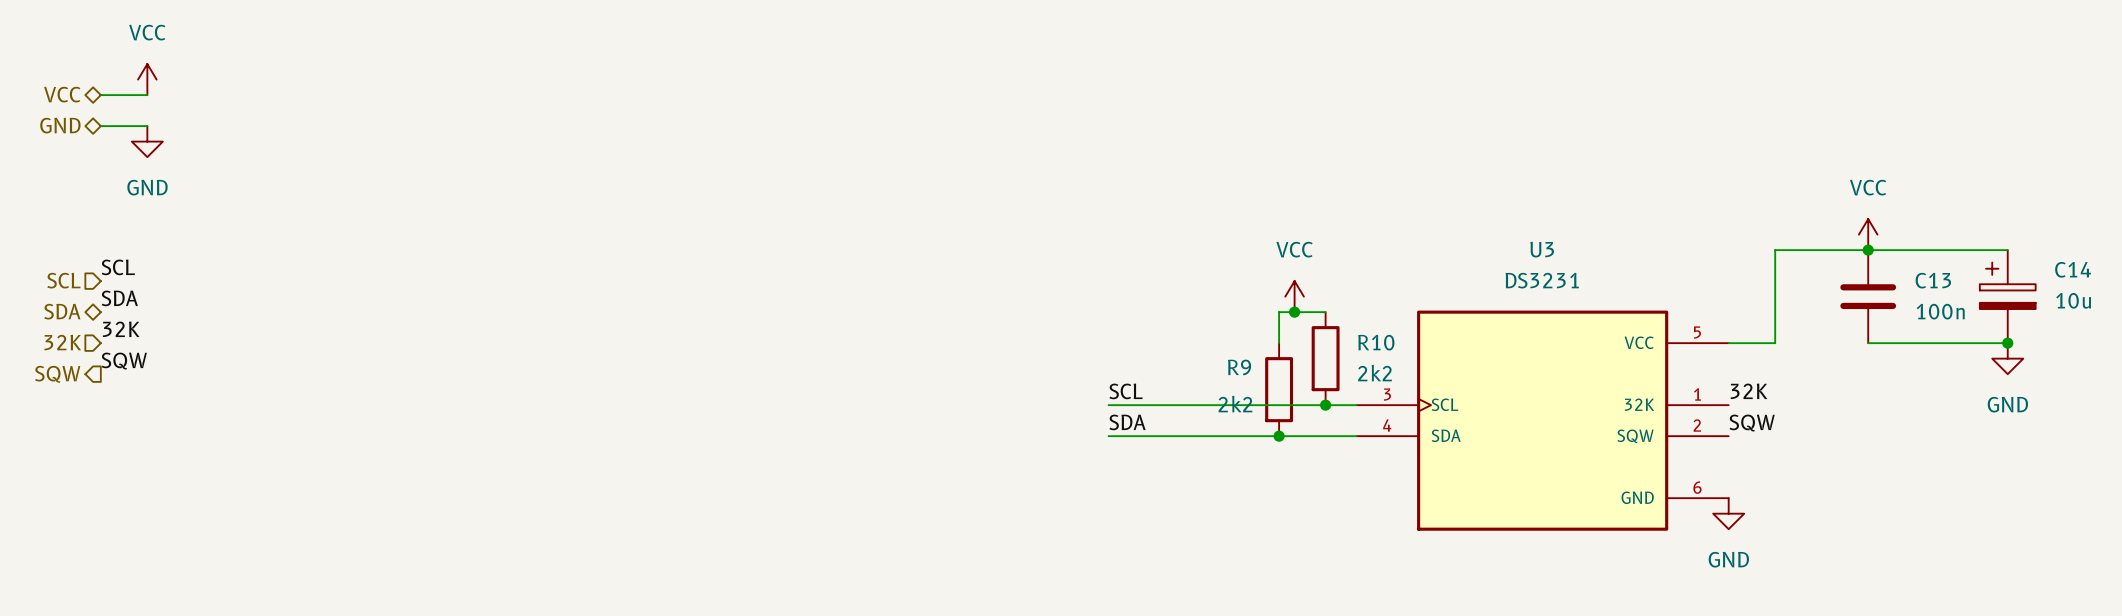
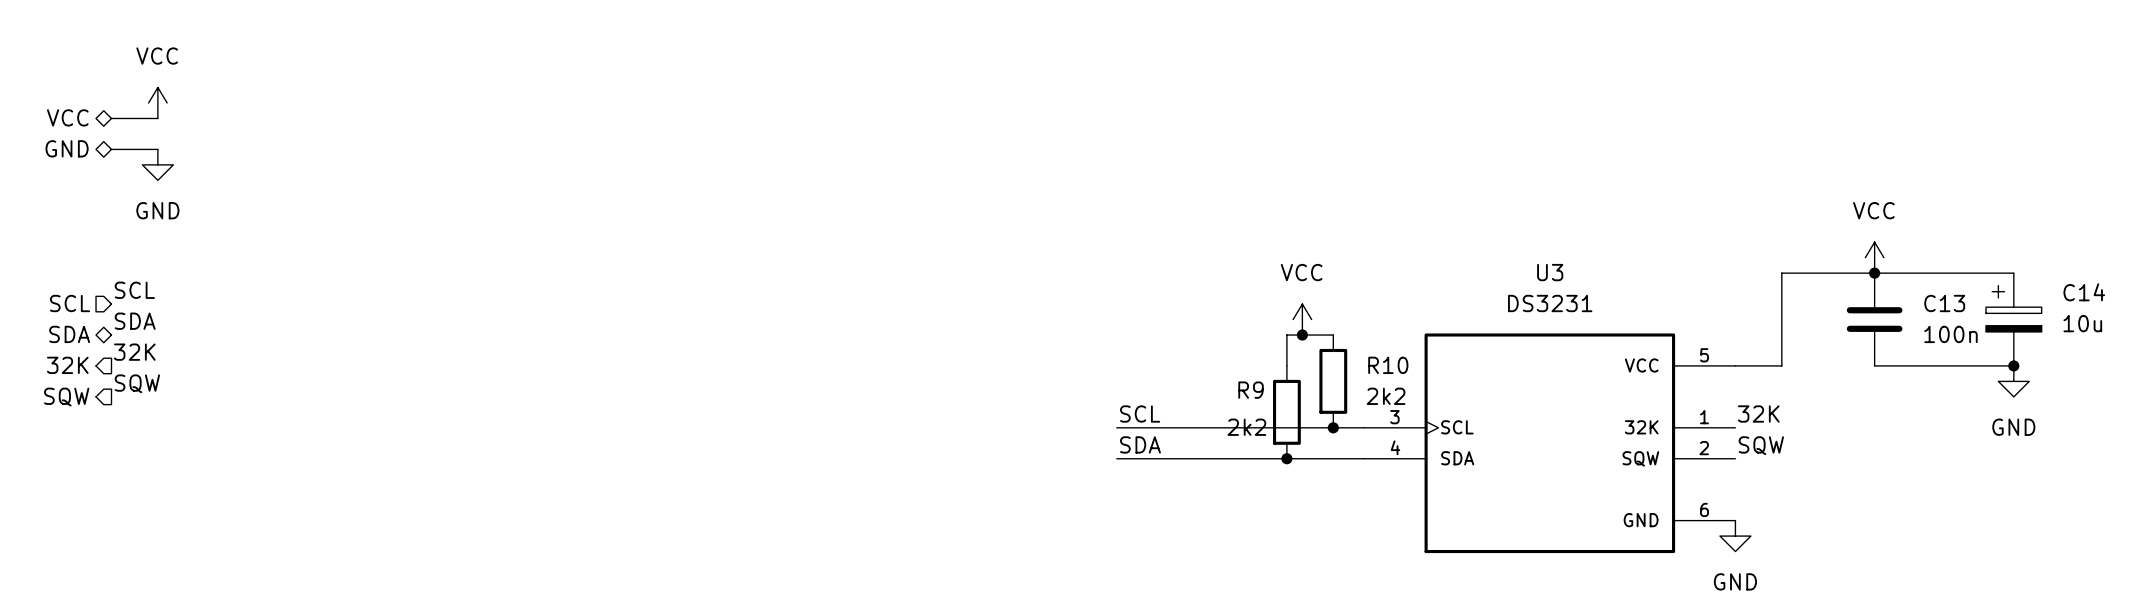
hierarchical label shape: input (62, 342) -> output (67, 365)

